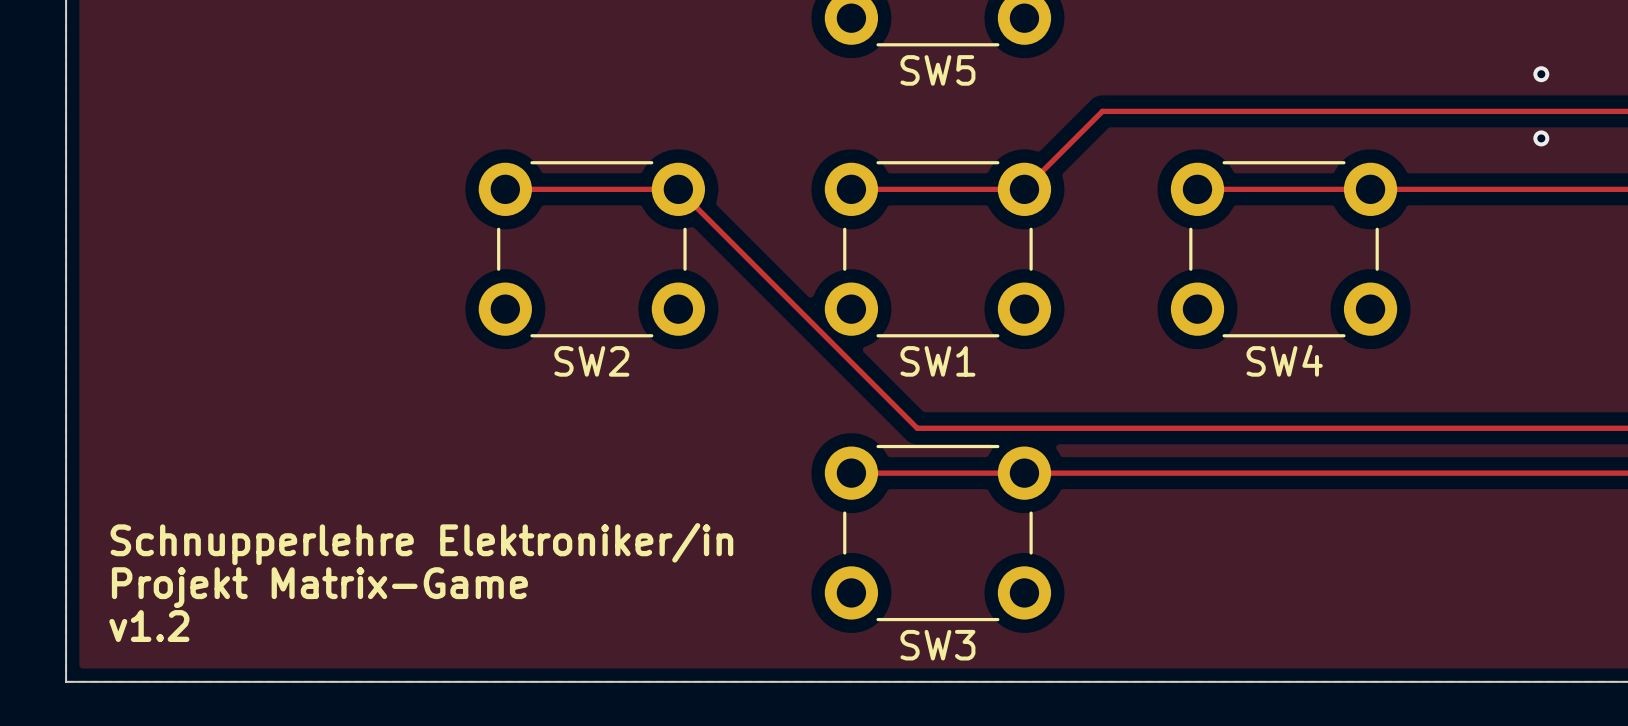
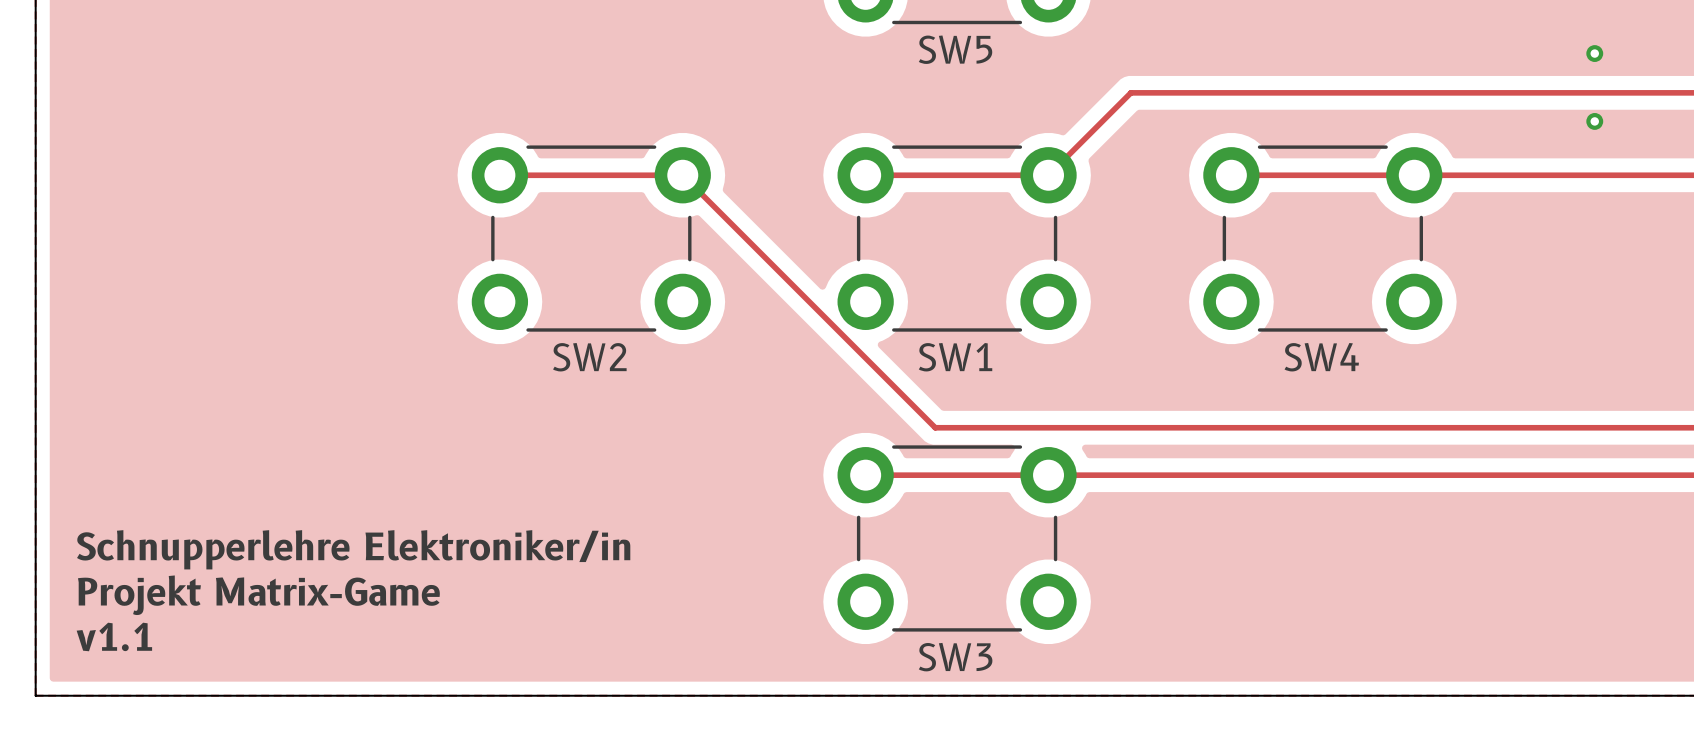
text: v1.2 (149, 626) -> v1.1 (114, 636)

